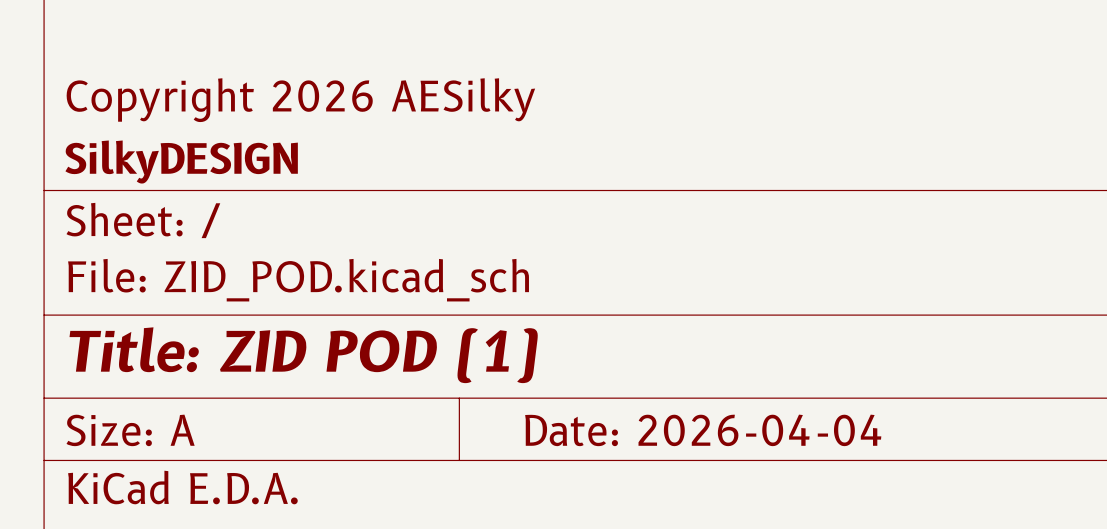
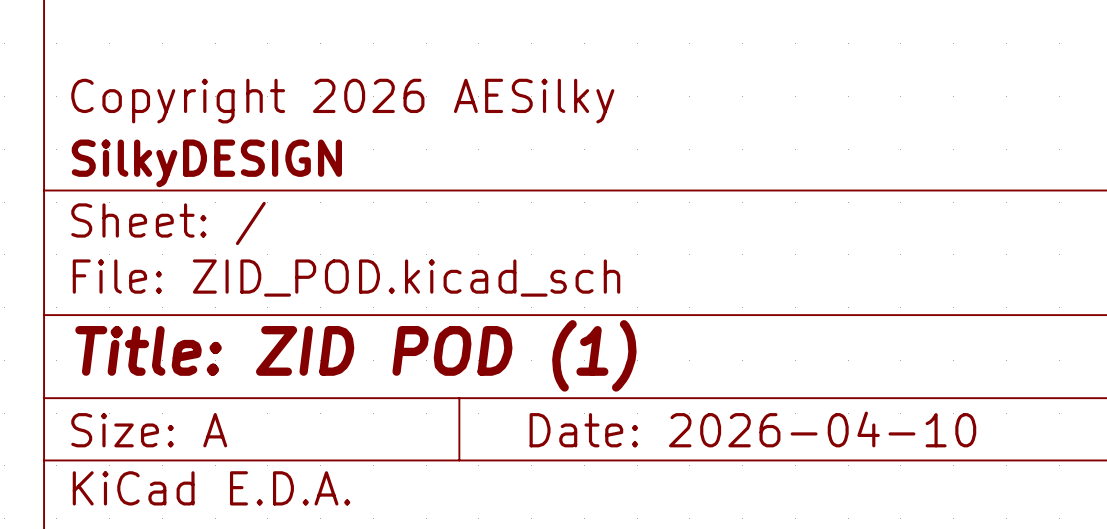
title block: Date: 2026-04-04 (703, 430) -> Date: 2026-04-10 (752, 429)

